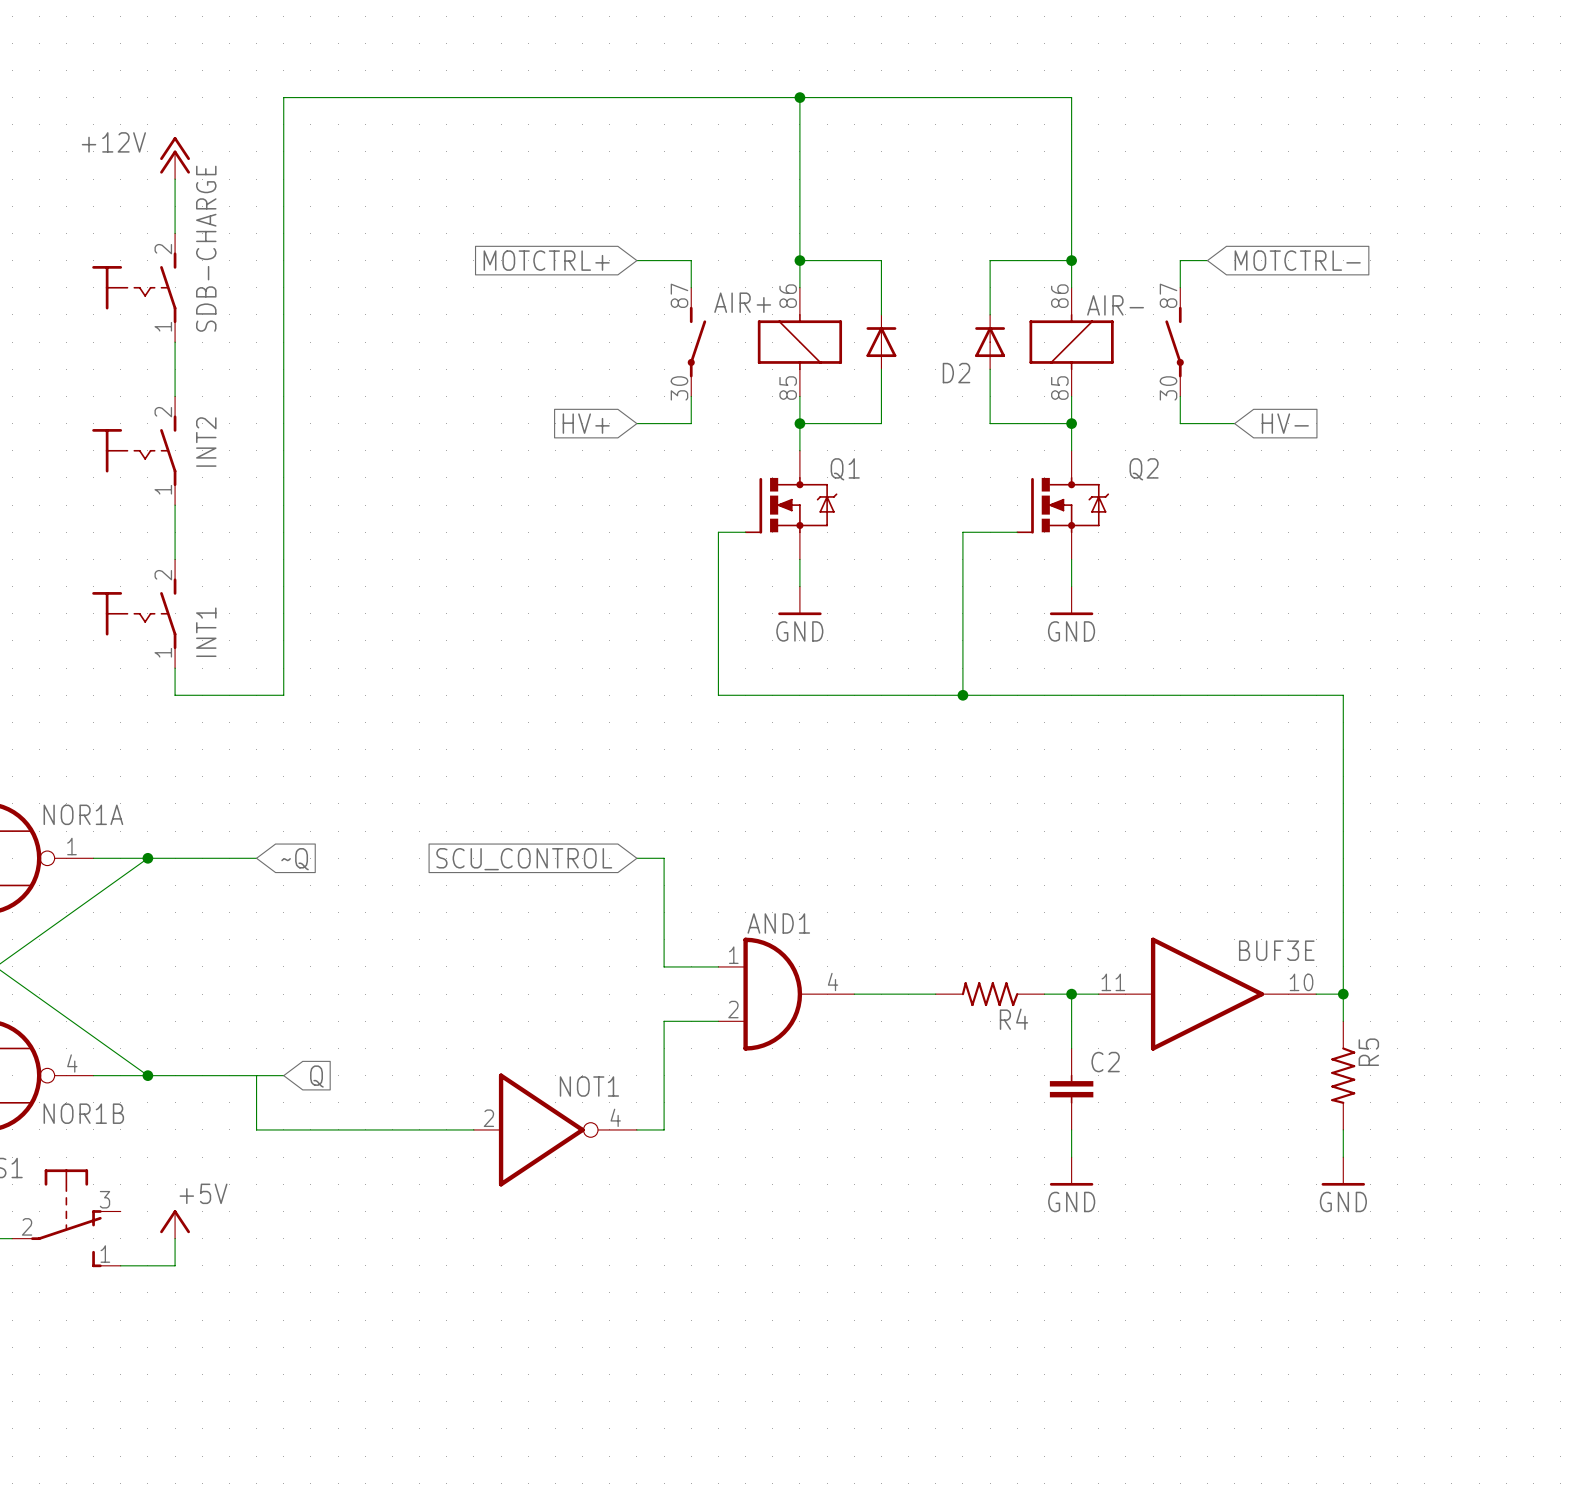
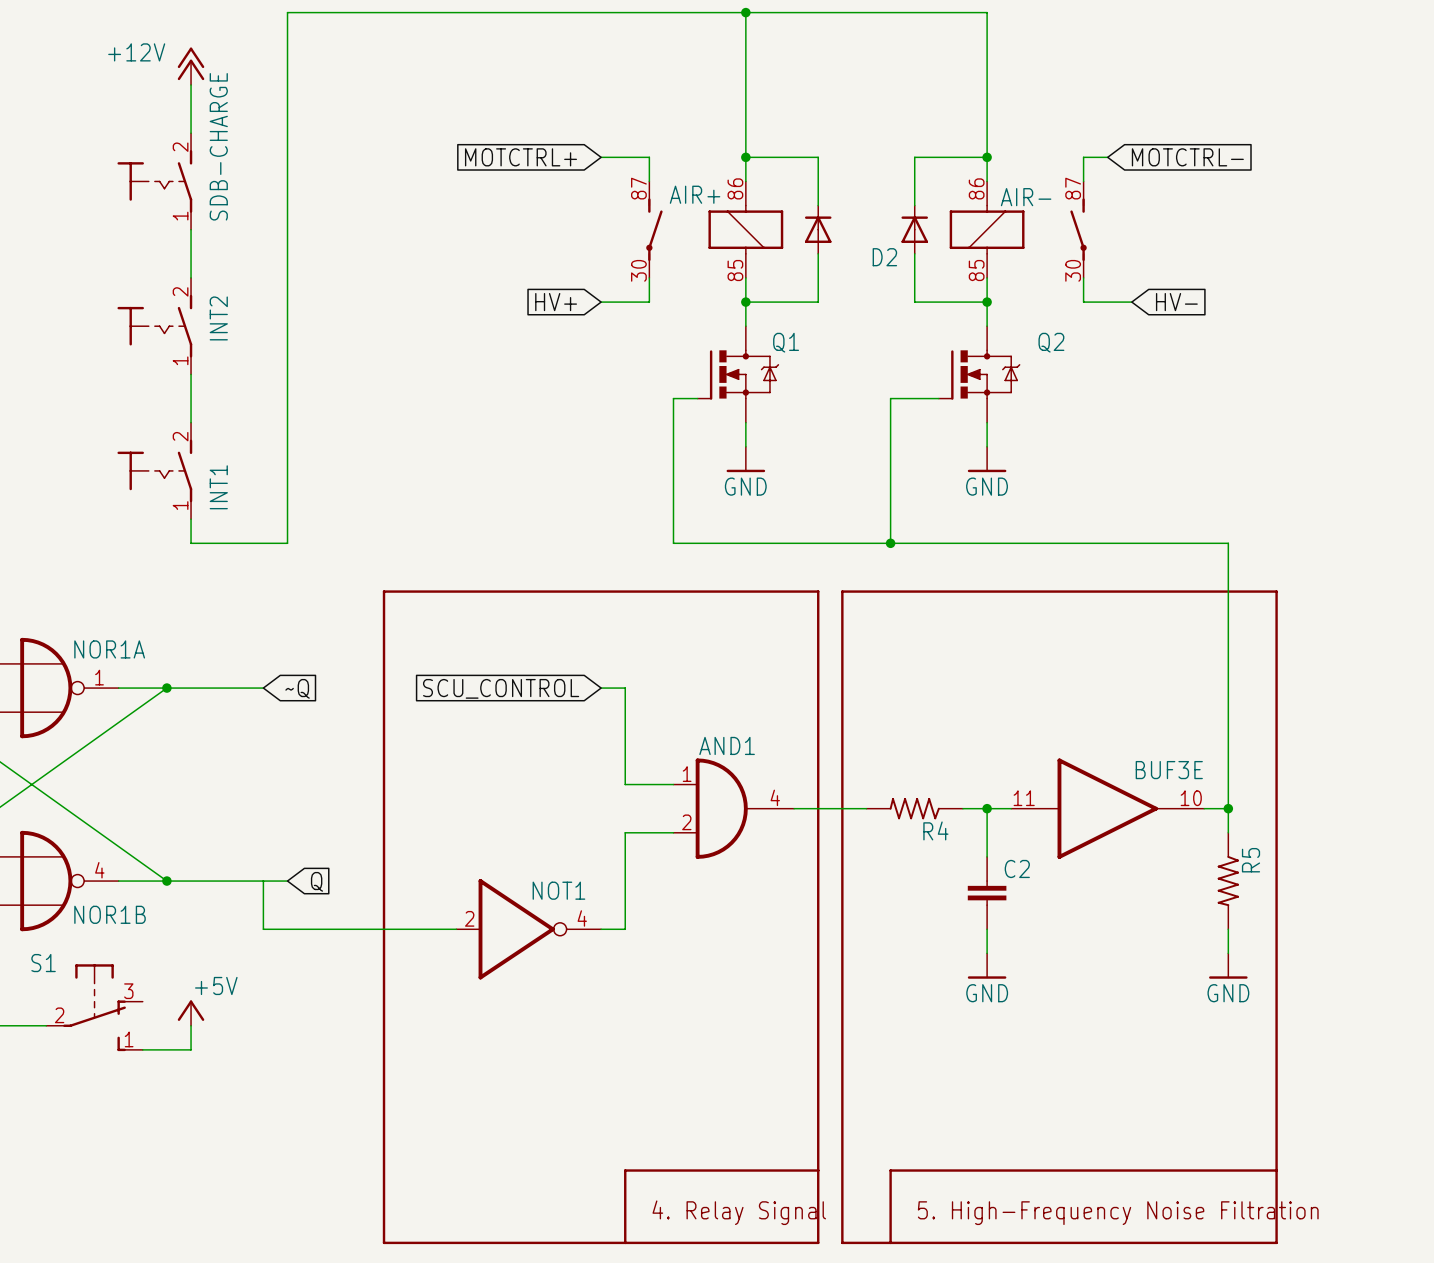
line: none -> (384, 591) (384, 1242) (818, 1242) (818, 591) (384, 591)
line: none -> (842, 591) (1276, 591) (1276, 1242) (842, 1242) (842, 591)
line: none -> (818, 1170) (625, 1170) (625, 1242)
line: none -> (1276, 1170) (890, 1170) (890, 1242)
text: none -> 4. Relay Signal (739, 1212)
text: none -> 5. High-Frequency Noise Filtration (1118, 1213)

